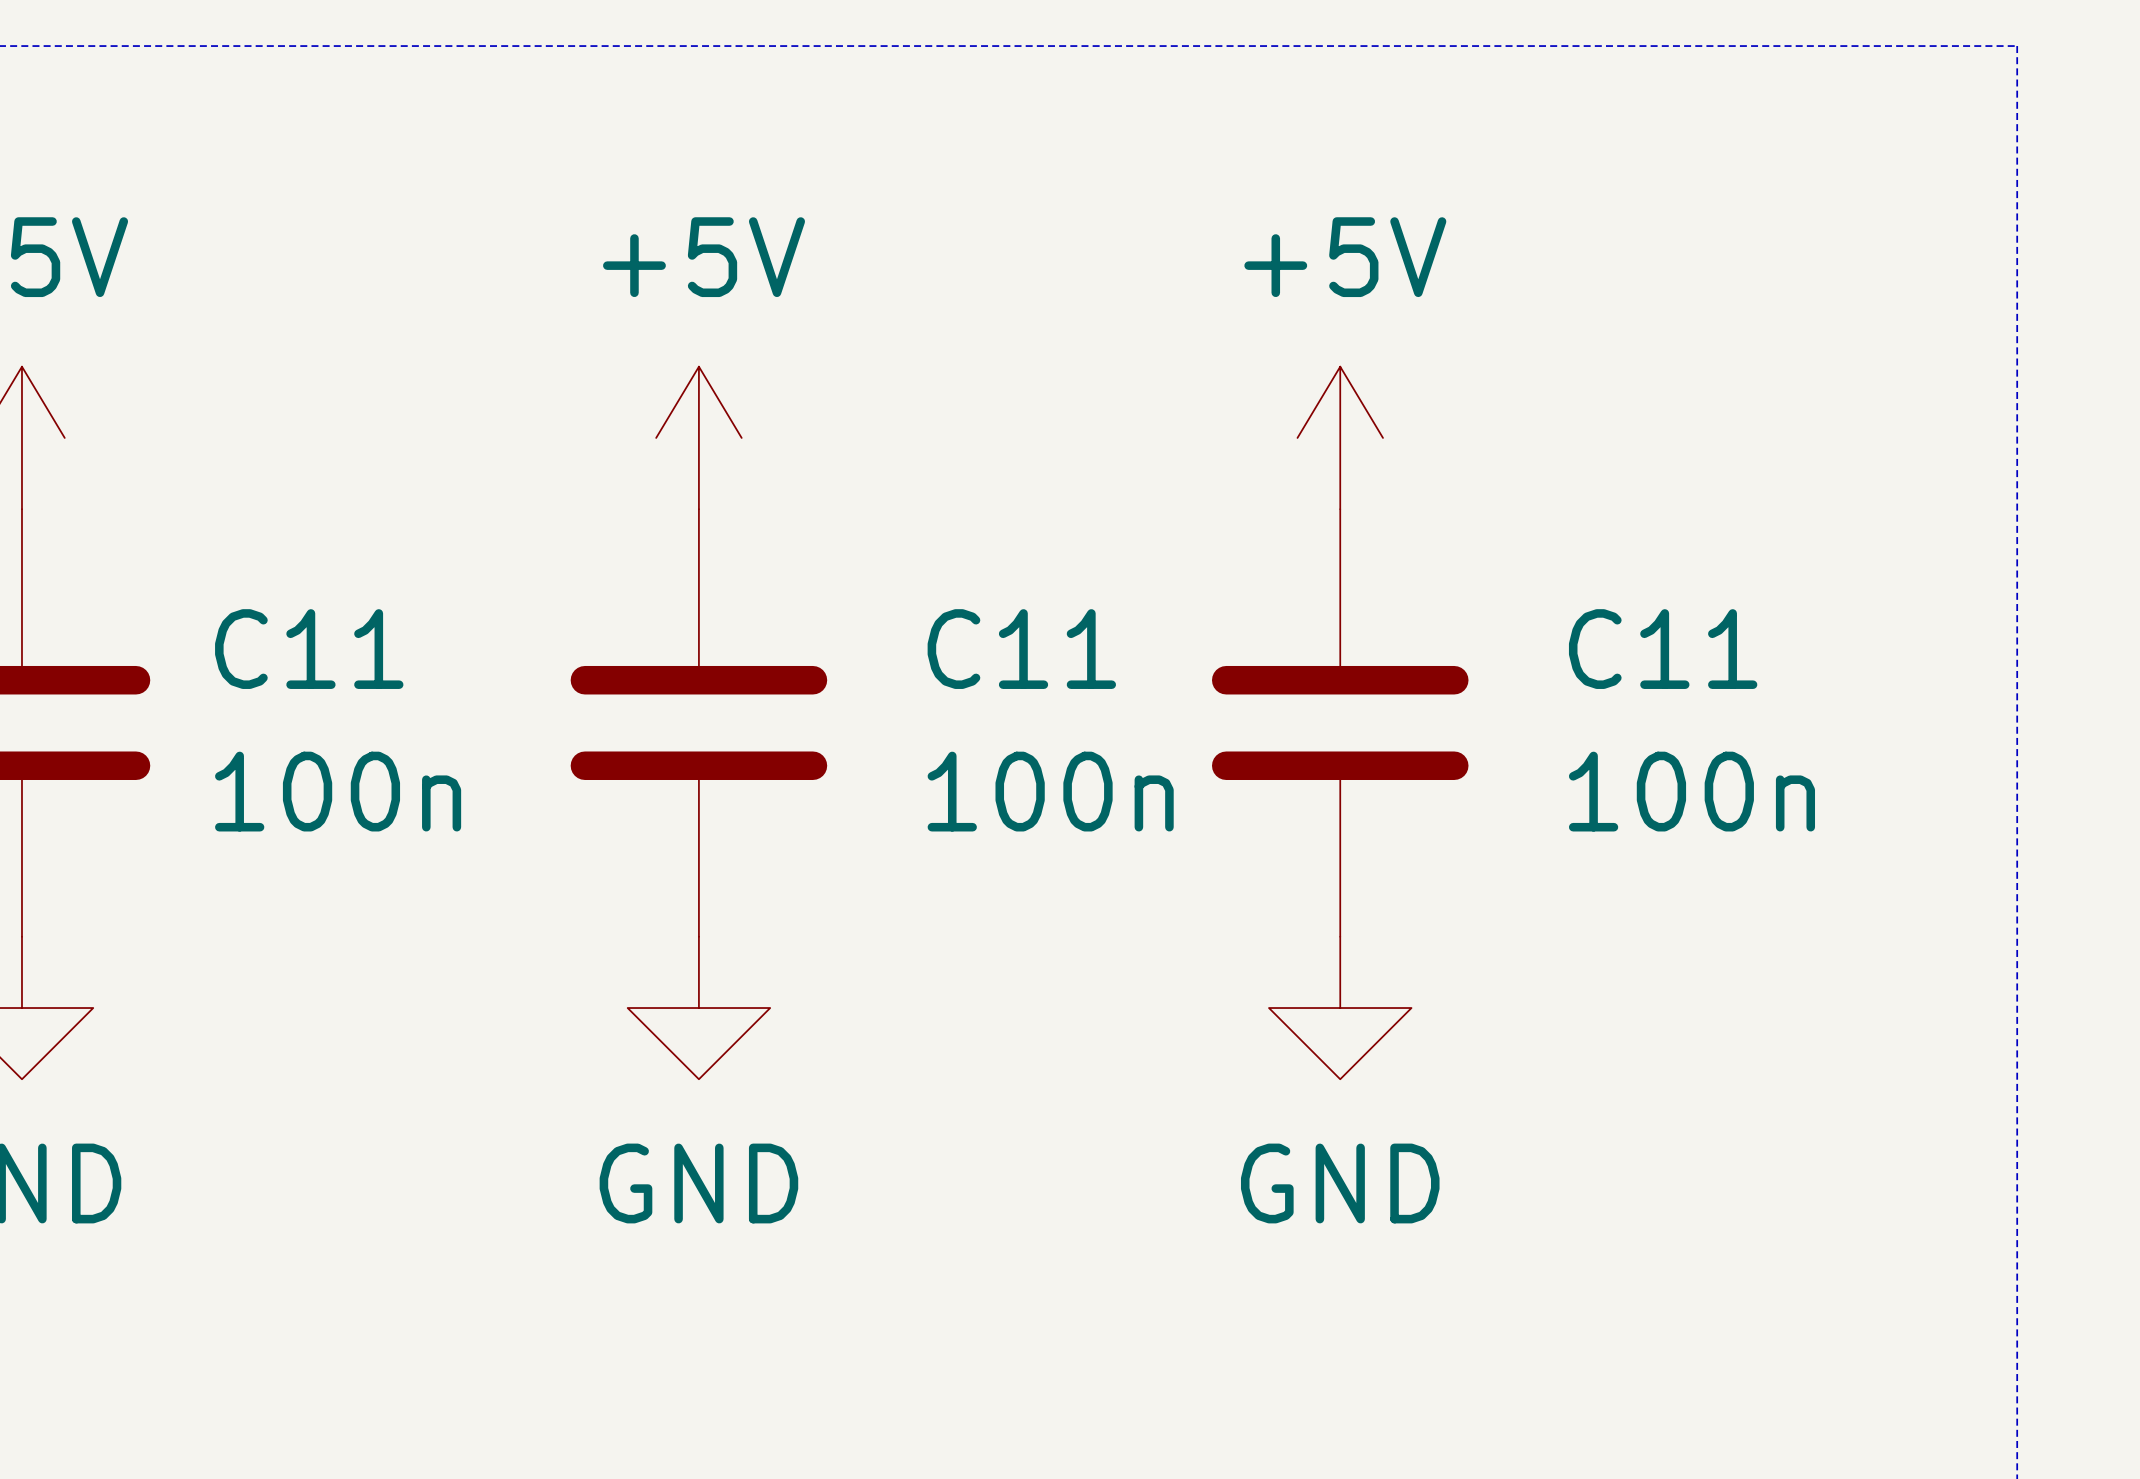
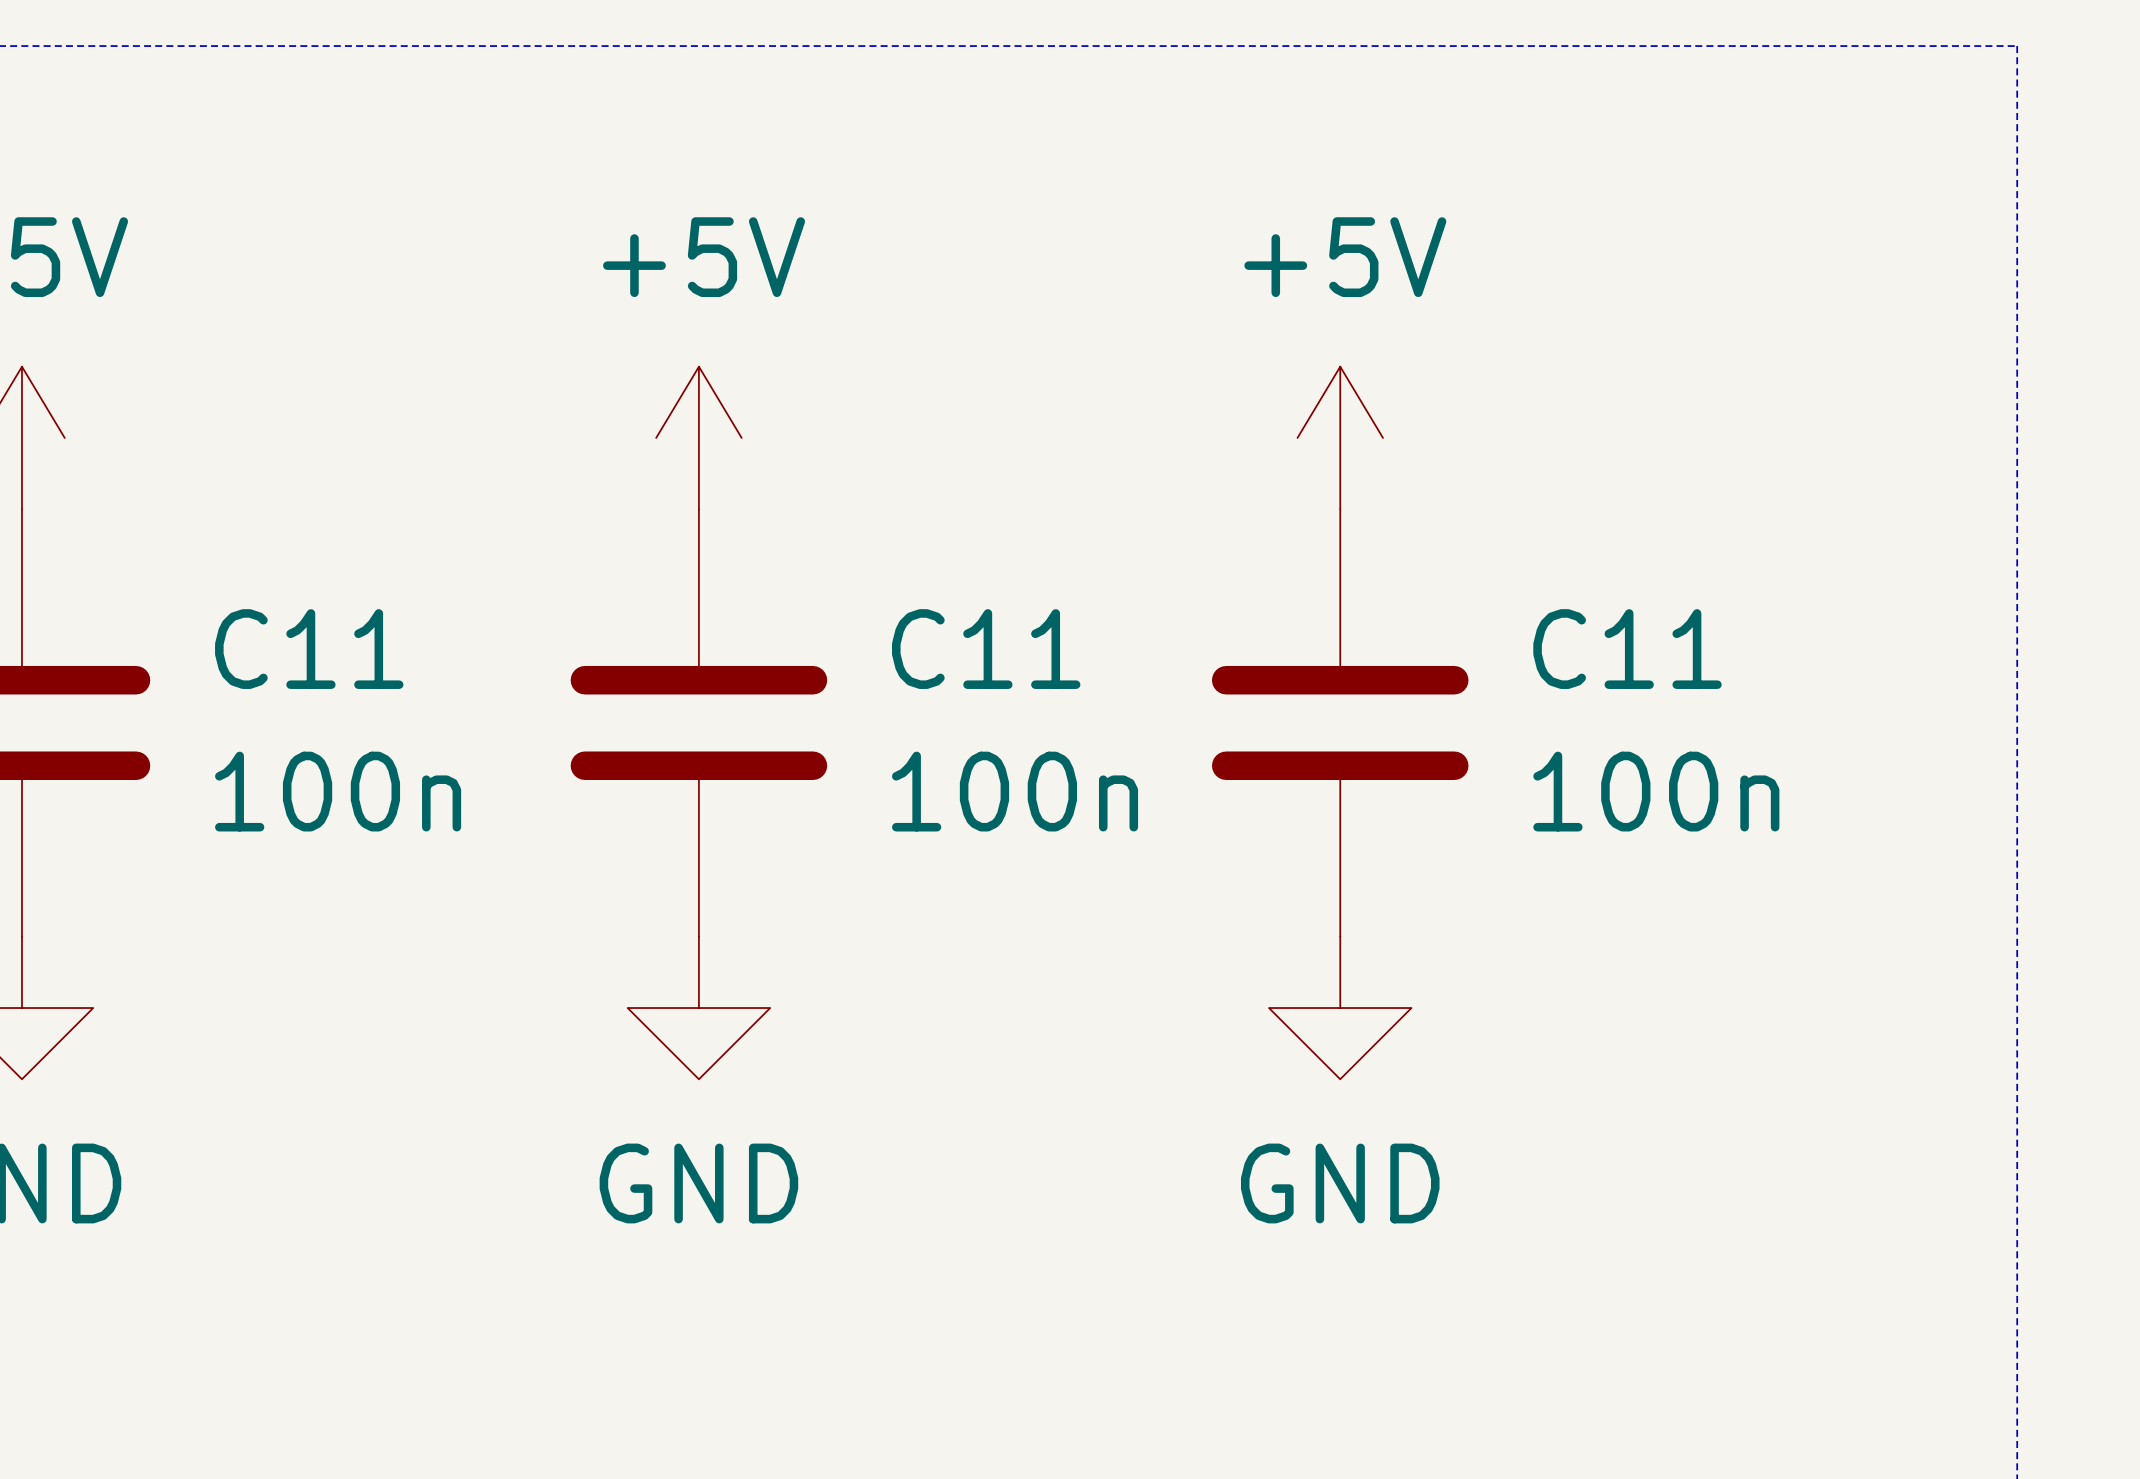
C11 name position: C11 (1021, 649) -> C11 (986, 649)
C11 name position: C11 (1663, 649) -> C11 (1627, 649)
C11 value position: 100n (1050, 791) -> 100n (1015, 791)
C11 value position: 100n (1691, 791) -> 100n (1656, 791)

